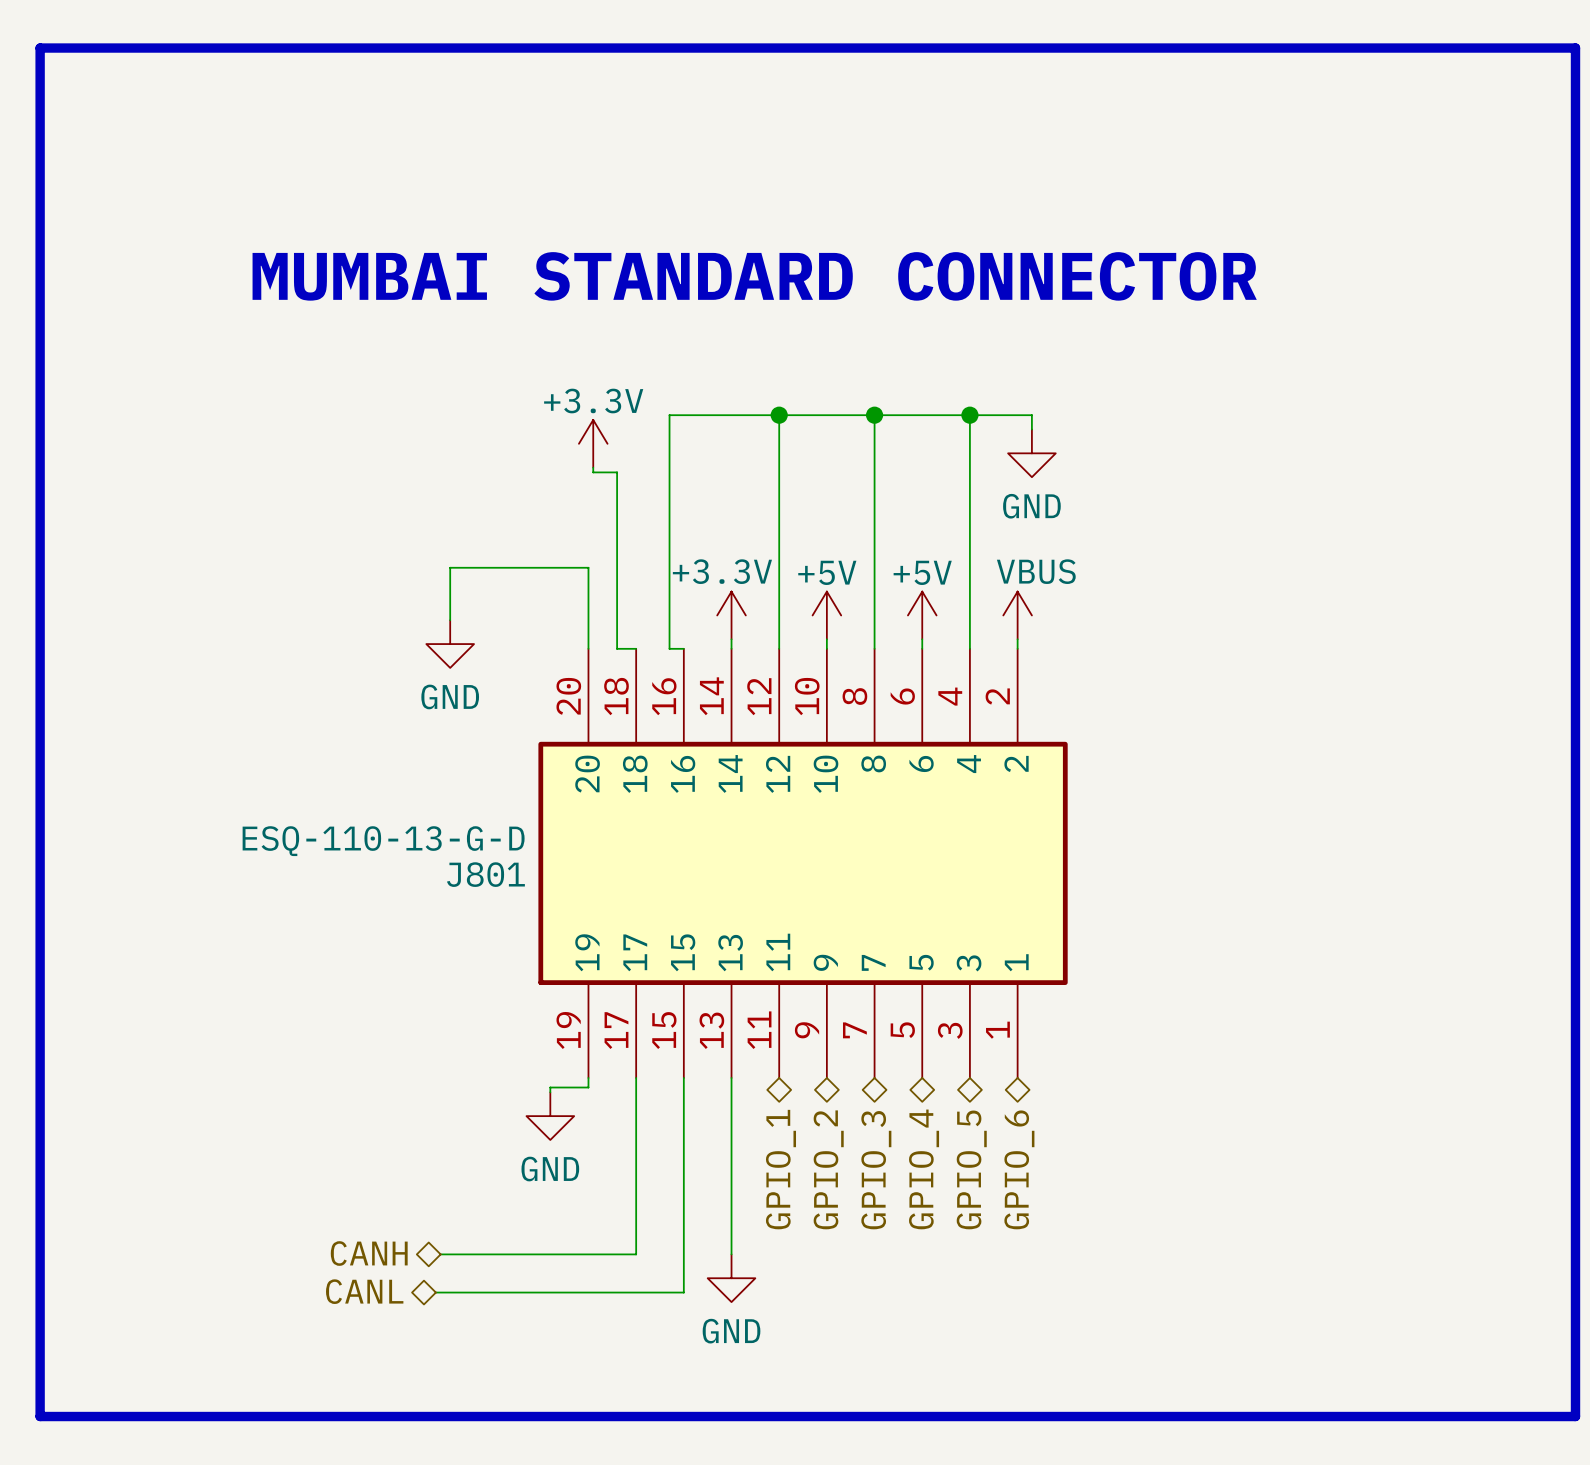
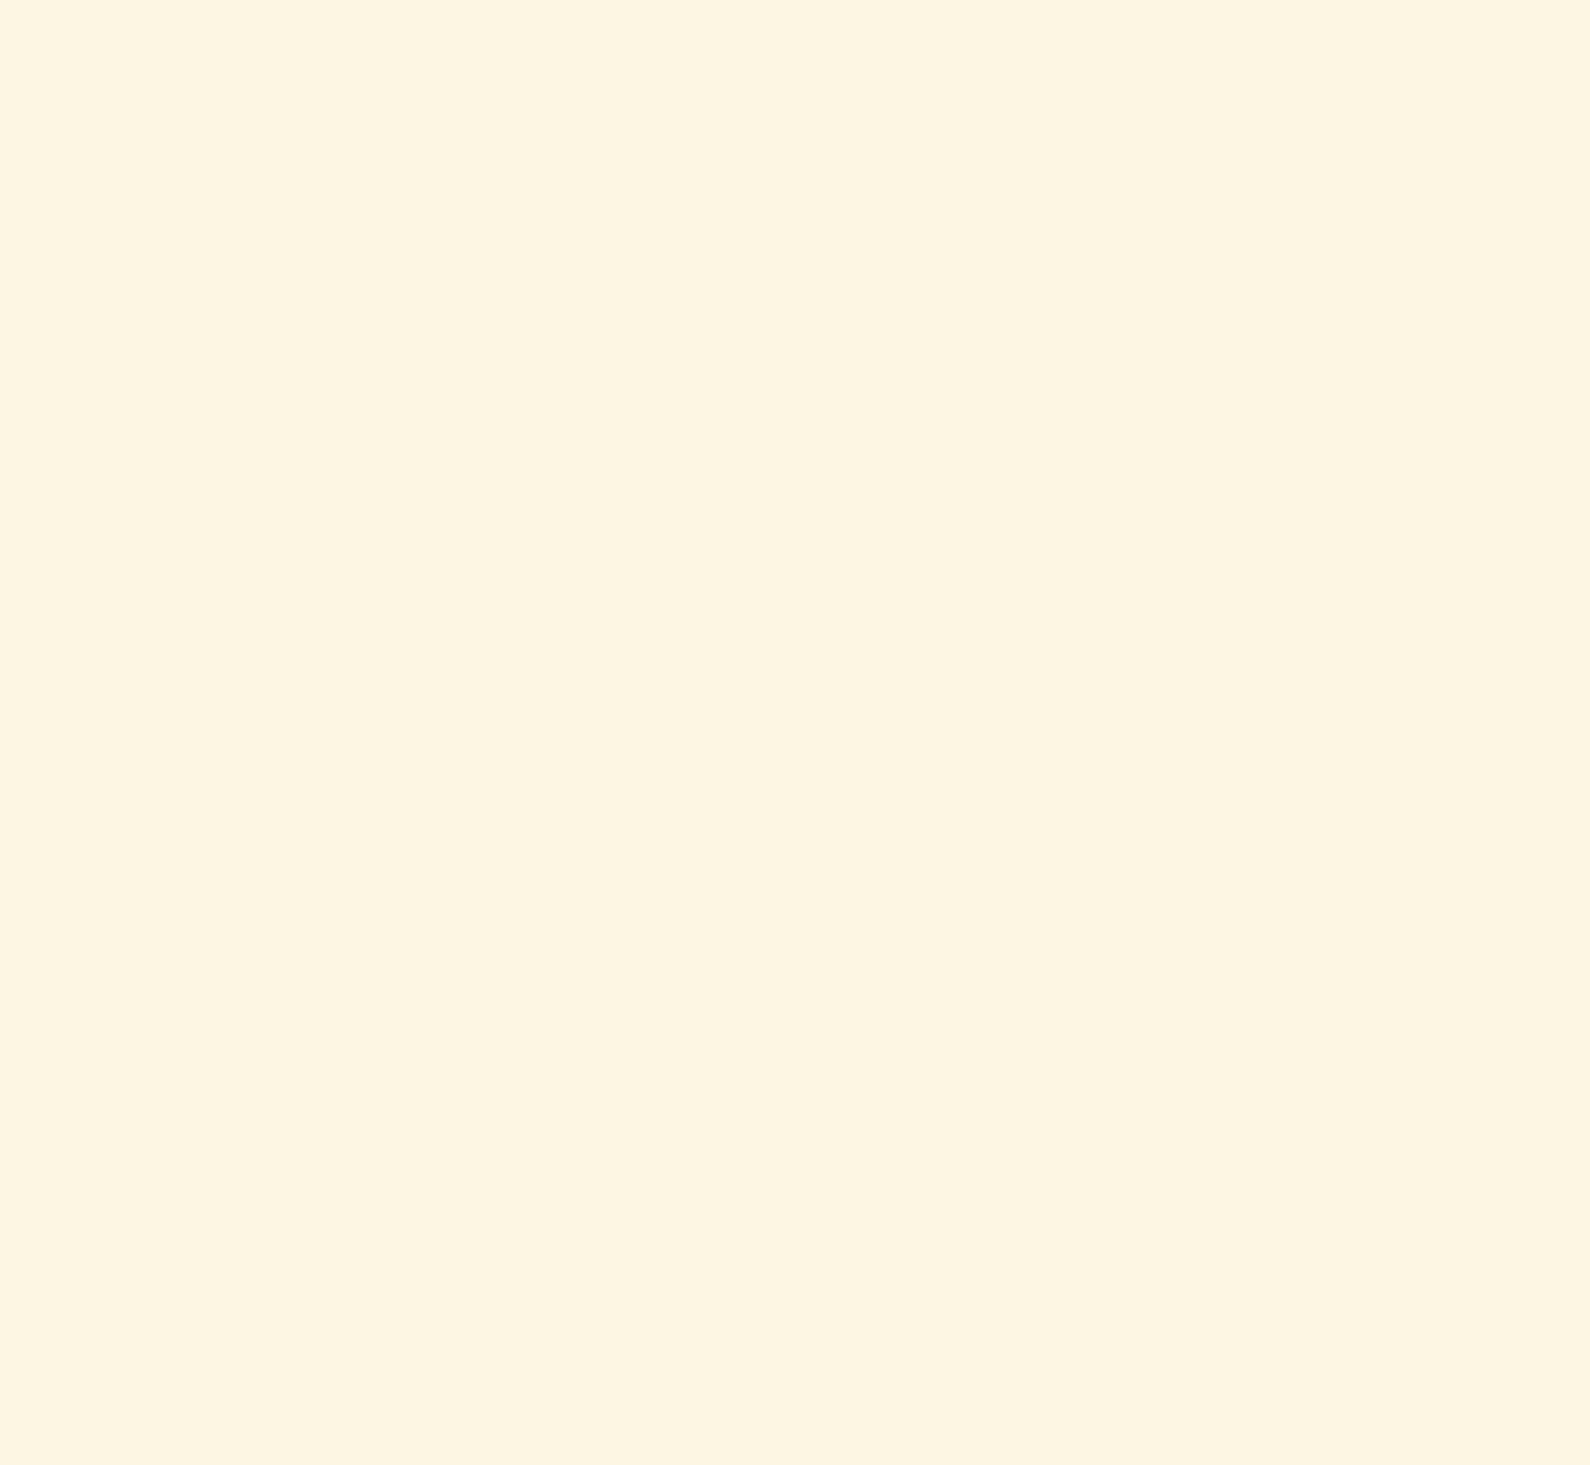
line: (40, 48) (1575, 48) (1575, 1416) (40, 1416) (40, 48) -> none
text: MUMBAI STANDARD CONNECTOR (754, 276) -> none
wire: (779, 415) (779, 648) -> none
junction: (779, 415) -> none
wire: (874, 415) (874, 648) -> none
junction: (874, 415) -> none
wire: (969, 415) (969, 648) -> none
junction: (969, 415) -> none
wire: (1031, 429) (1031, 415) (669, 415) (669, 648) (683, 648) -> none
power symbol: +3.3V (593, 443) -> none
power symbol: GND (1031, 453) -> none
wire: (593, 467) (593, 472) (617, 472) (617, 648) (636, 648) -> none
power symbol: +3.3V (731, 615) -> none
power symbol: +5V (826, 615) -> none
power symbol: +5V (922, 615) -> none
power symbol: VBUS (1017, 615) -> none
wire: (450, 620) (450, 567) (588, 567) (588, 648) -> none
wire: (731, 639) (731, 648) -> none
wire: (826, 639) (826, 648) -> none
wire: (922, 639) (922, 648) -> none
wire: (1017, 639) (1017, 648) -> none
power symbol: GND (450, 644) -> none
J801: ESQ-110-13-G-D (803, 863) -> none
wire: (588, 1077) (588, 1087) (550, 1087) (550, 1092) -> none
wire: (636, 1077) (636, 1254) (440, 1254) -> none
wire: (683, 1077) (683, 1292) (435, 1292) -> none
wire: (731, 1077) (731, 1254) -> none
power symbol: GND (550, 1116) -> none
hierarchical label: GPIO_1 (780, 1169) -> none
hierarchical label: GPIO_2 (828, 1169) -> none
hierarchical label: GPIO_4 (924, 1169) -> none
hierarchical label: GPIO_5 (971, 1169) -> none
hierarchical label: GPIO_6 (1019, 1169) -> none
hierarchical label: GPIO_3 (876, 1170) -> none
hierarchical label: CANH (369, 1253) -> none
power symbol: GND (731, 1278) -> none
hierarchical label: CANL (364, 1291) -> none

